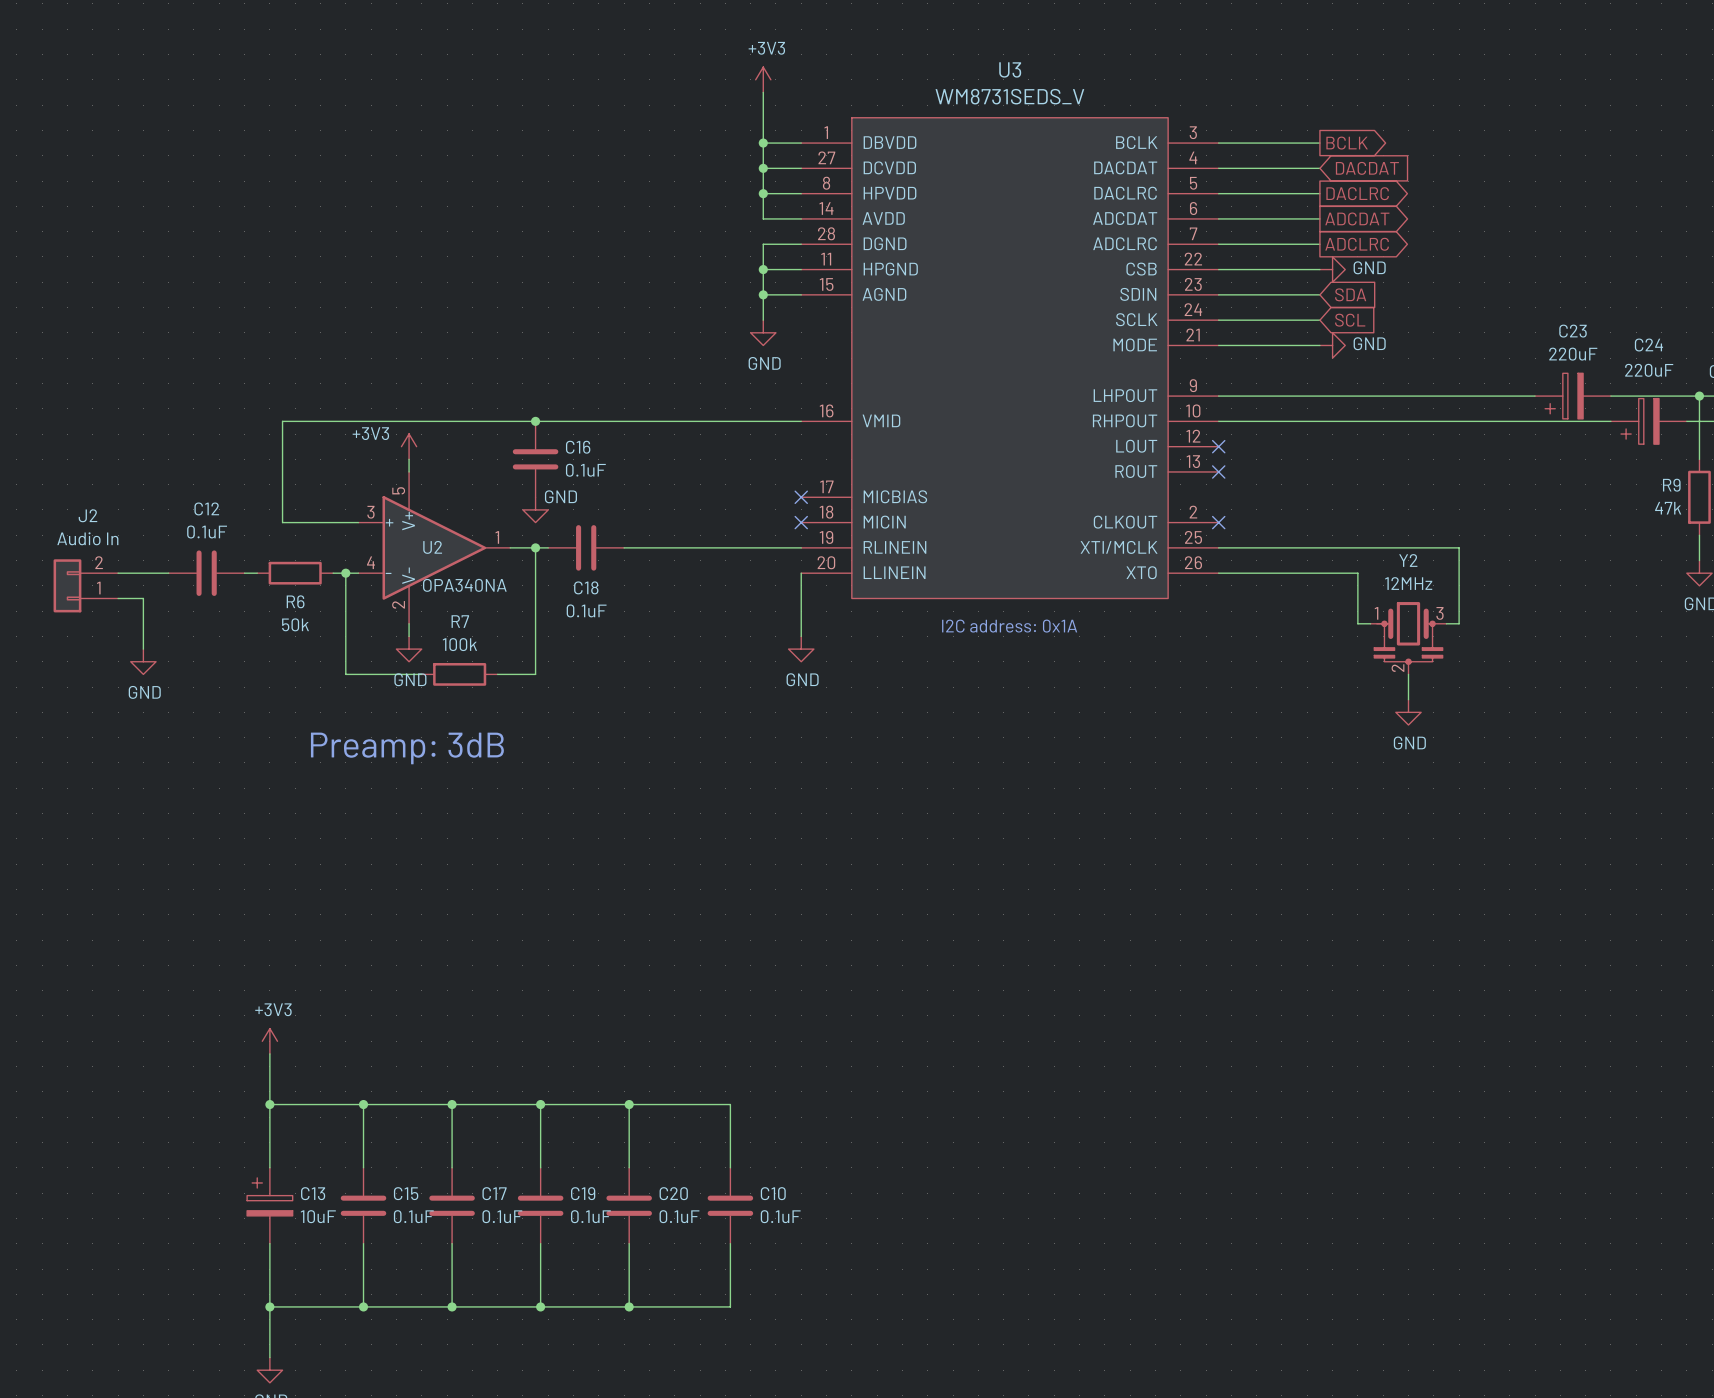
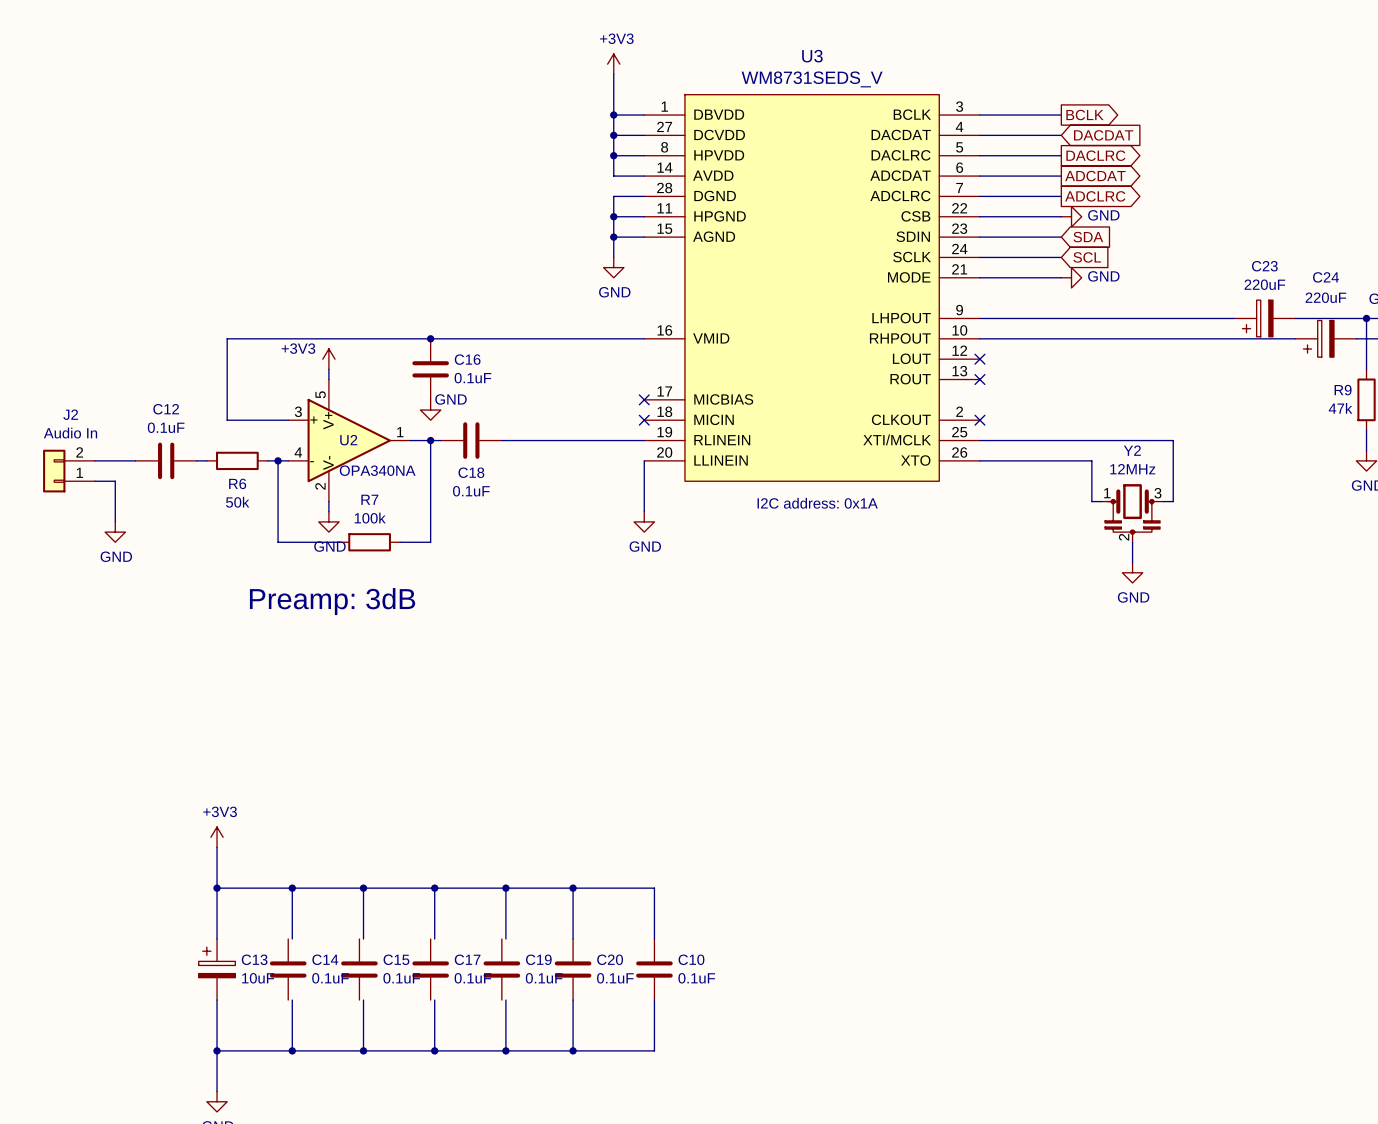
wire: none -> (573, 888) (573, 939)
junction: none -> (573, 888)
wire: (730, 1104) (730, 1167) -> (587, 888) (654, 888) (654, 939)
C14: none -> 0.1uF (288, 969)
C15 position: (363, 1205) -> (359, 969)
C17 position: (452, 1205) -> (430, 969)
C19 position: (540, 1205) -> (501, 969)
C20 position: (629, 1205) -> (573, 969)
C10 position: (730, 1205) -> (654, 969)
wire: none -> (573, 1000) (573, 1050)
wire: (730, 1243) (730, 1306) -> (654, 1000) (654, 1050) (587, 1050)
junction: none -> (573, 1050)

